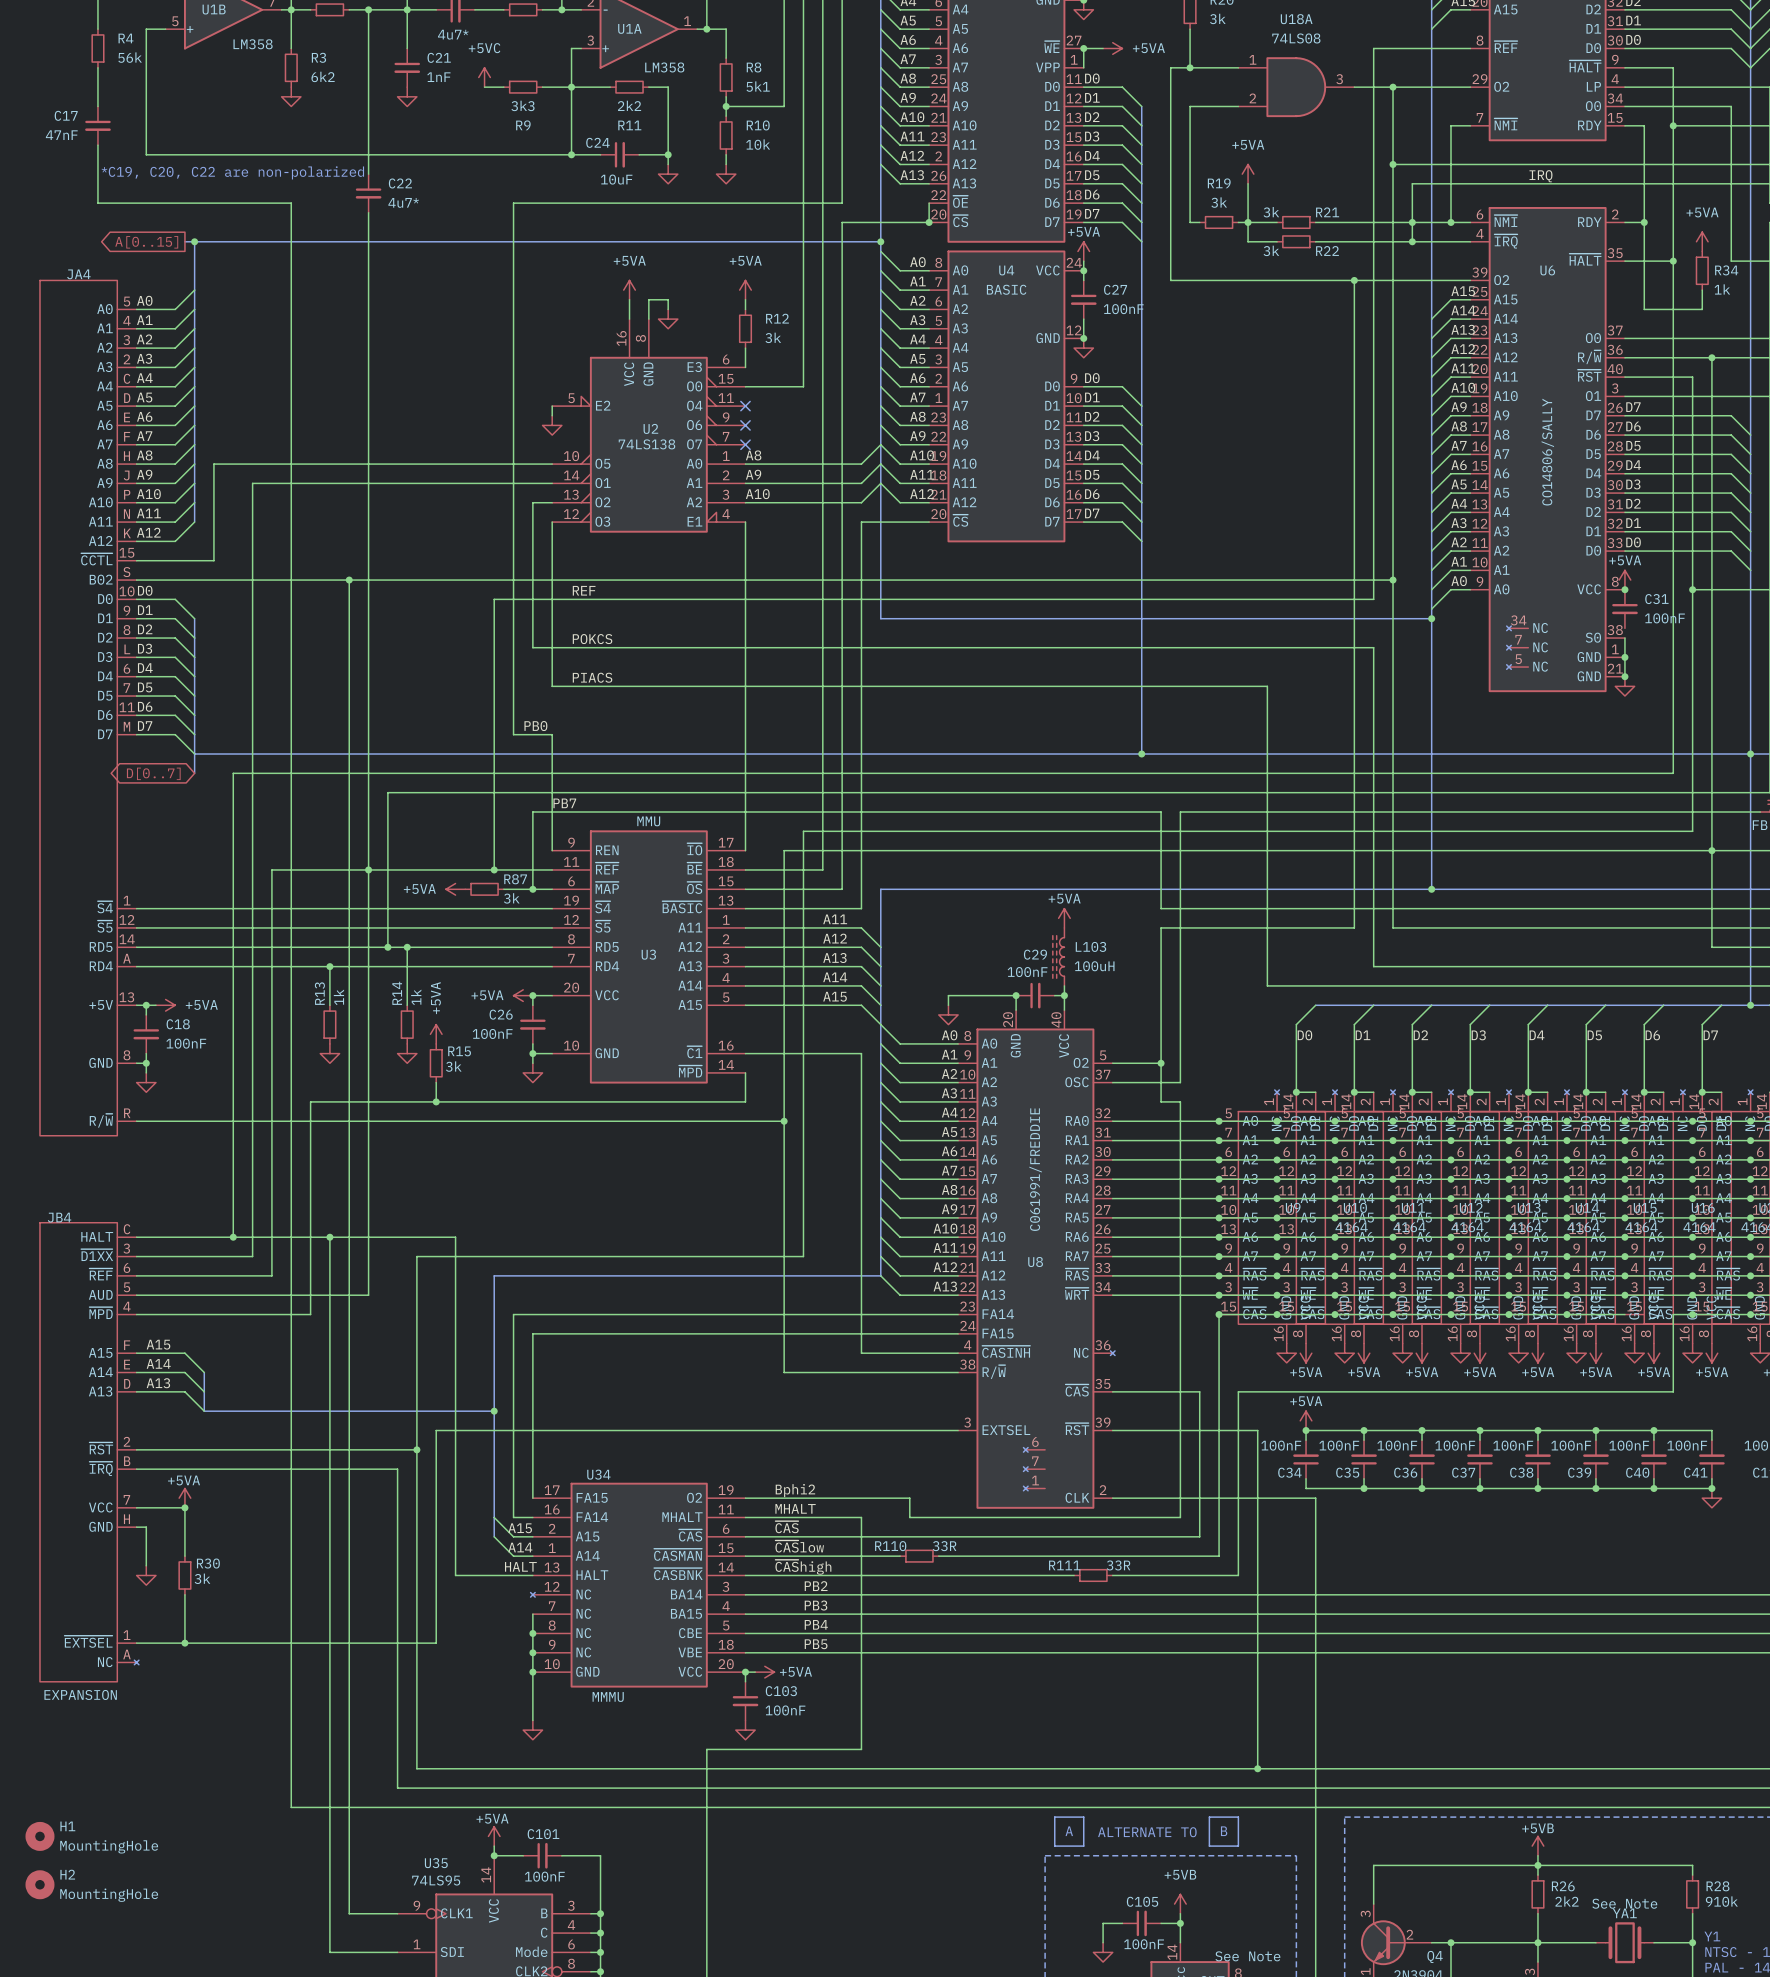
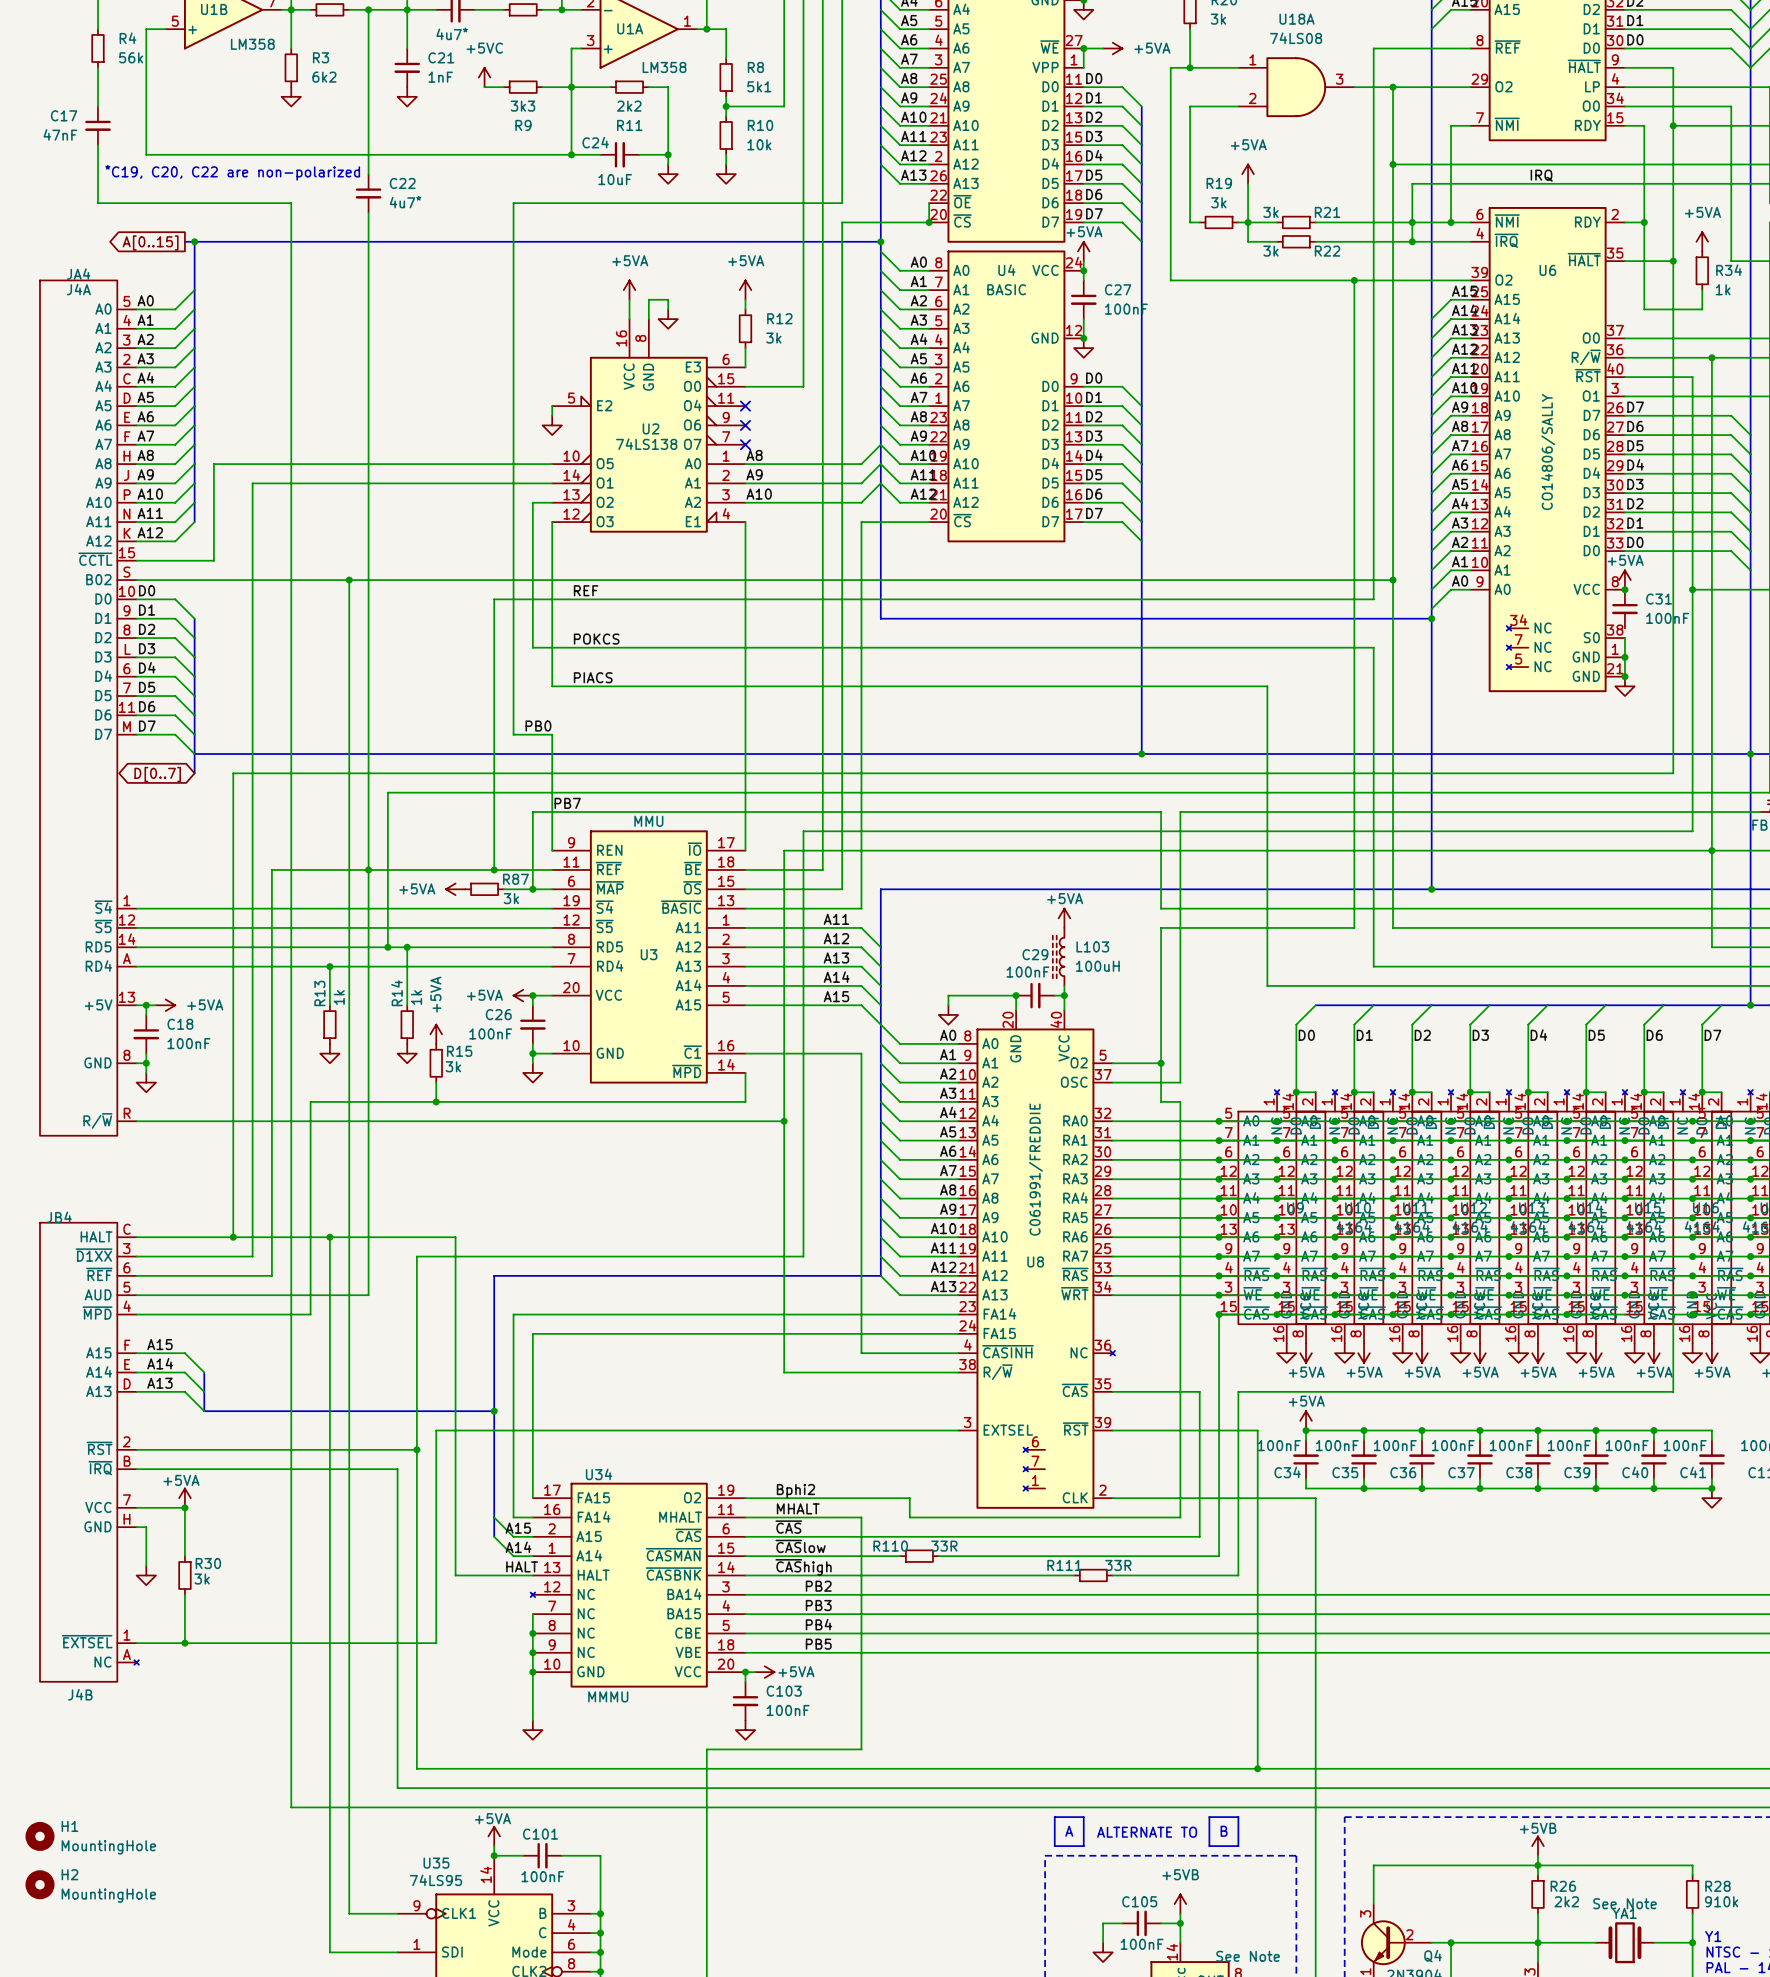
JA4 value: none -> J4A (78, 289)
JB4 value: EXPANSION (80, 1694) -> J4B (80, 1694)

